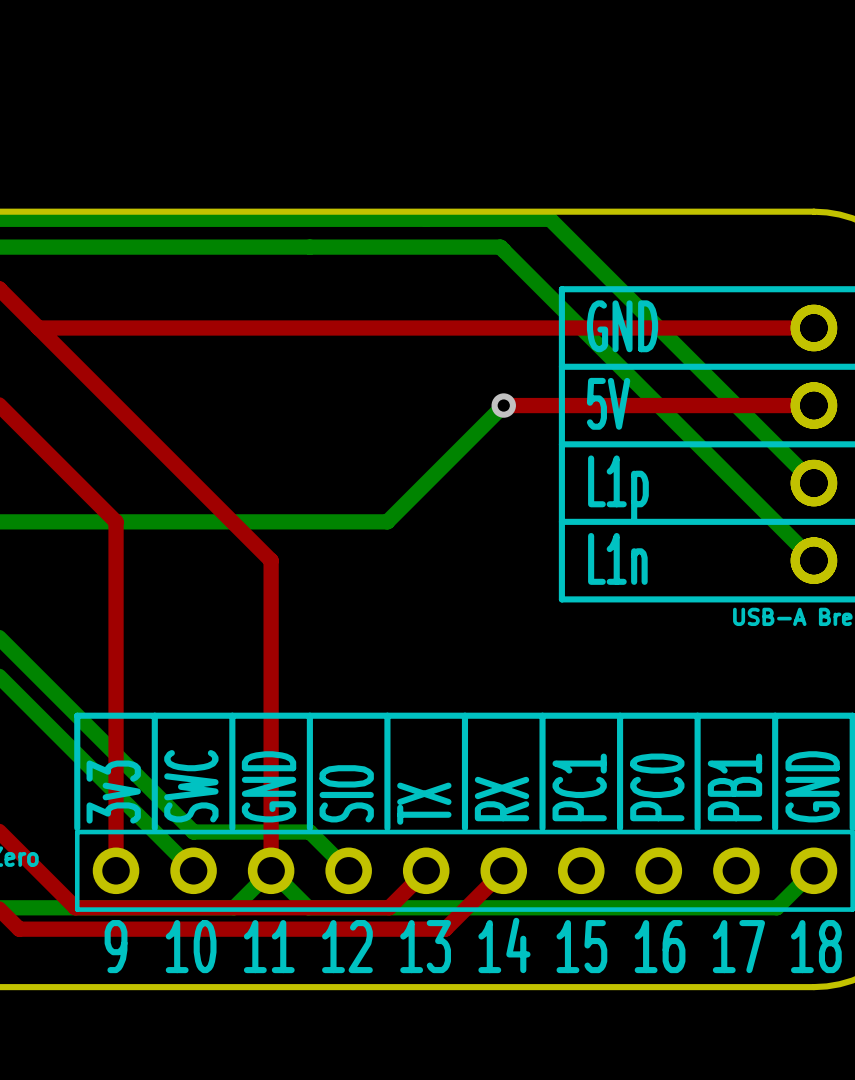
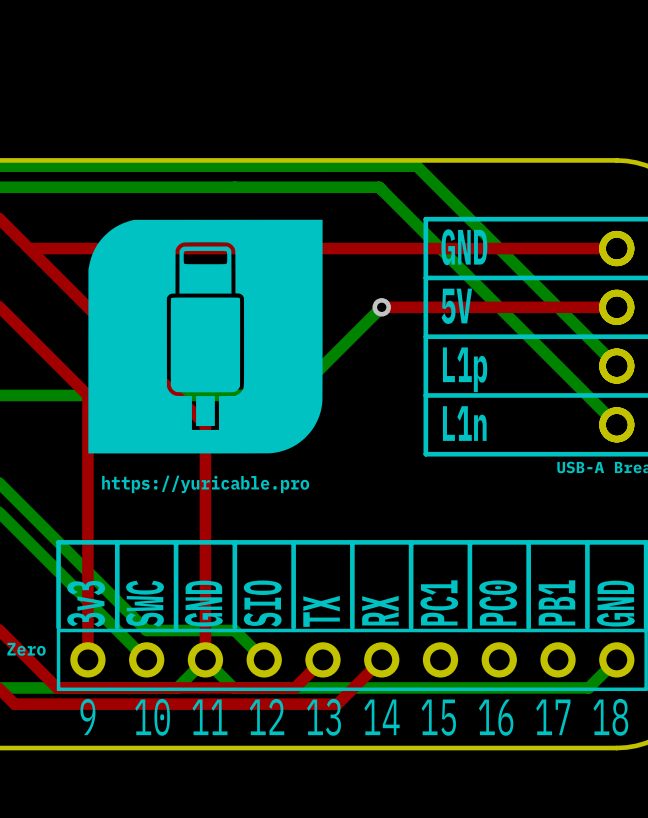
drawing: none -> [88, 219, 323, 454]
text: none -> https://yuricable.pro (205, 484)

